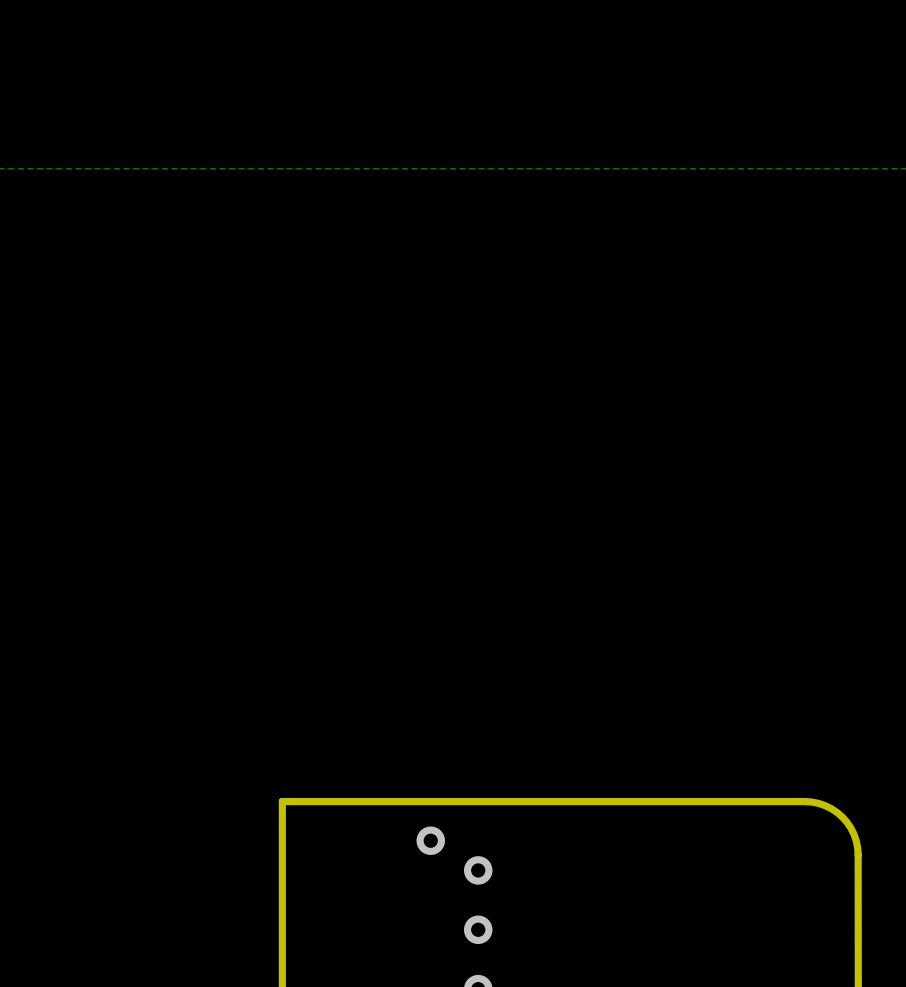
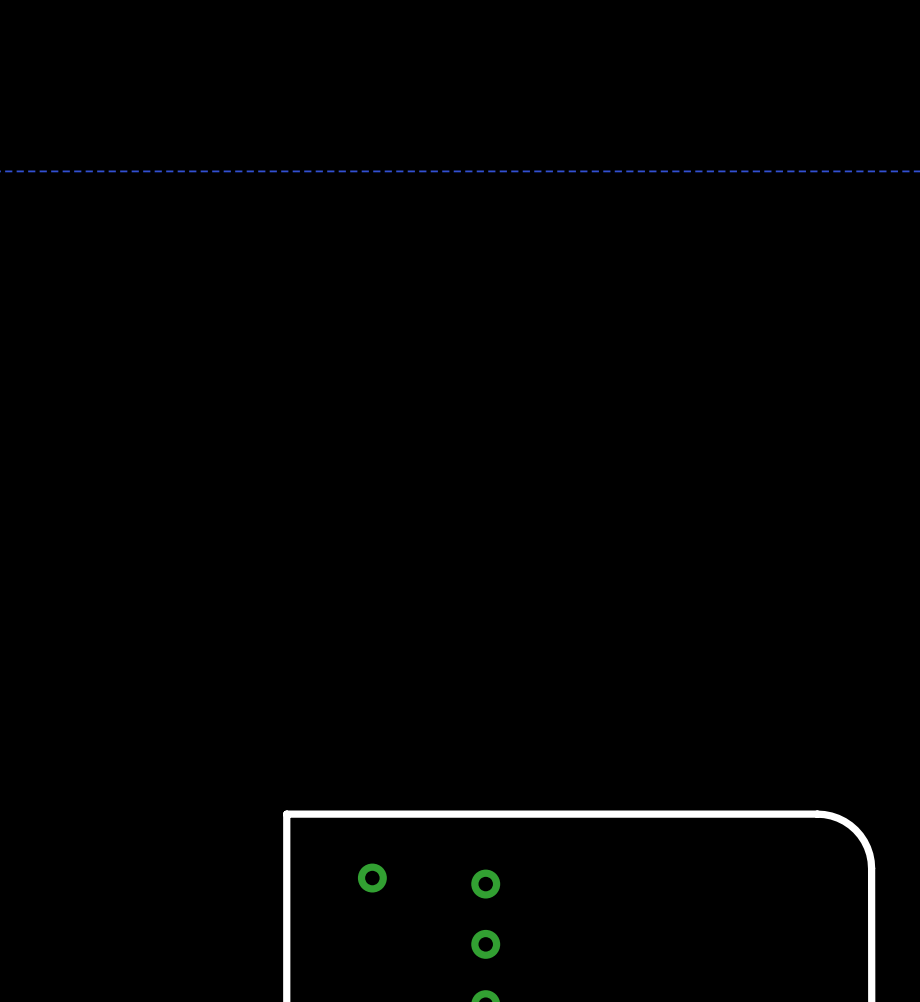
via position: (430, 840) -> (372, 878)

